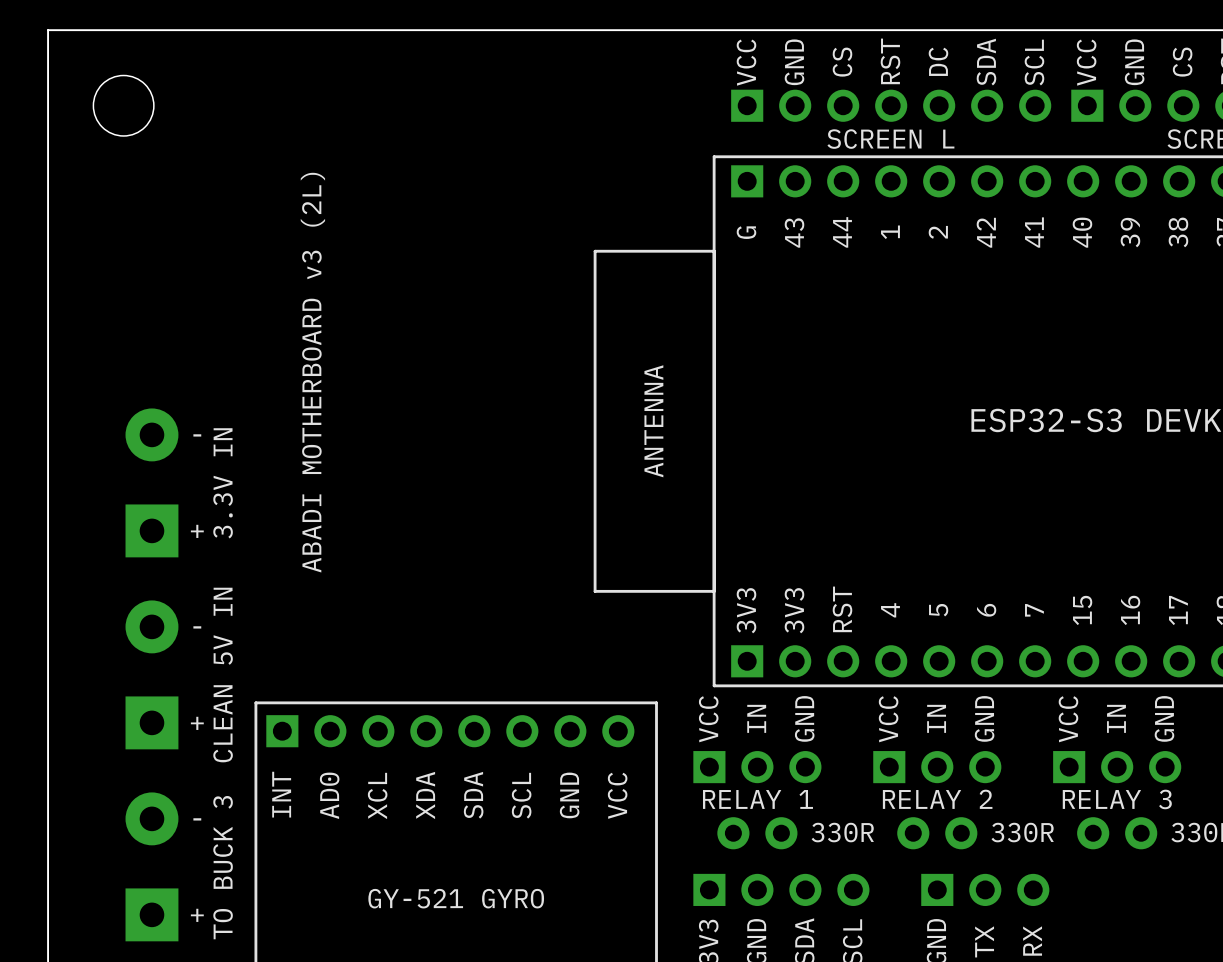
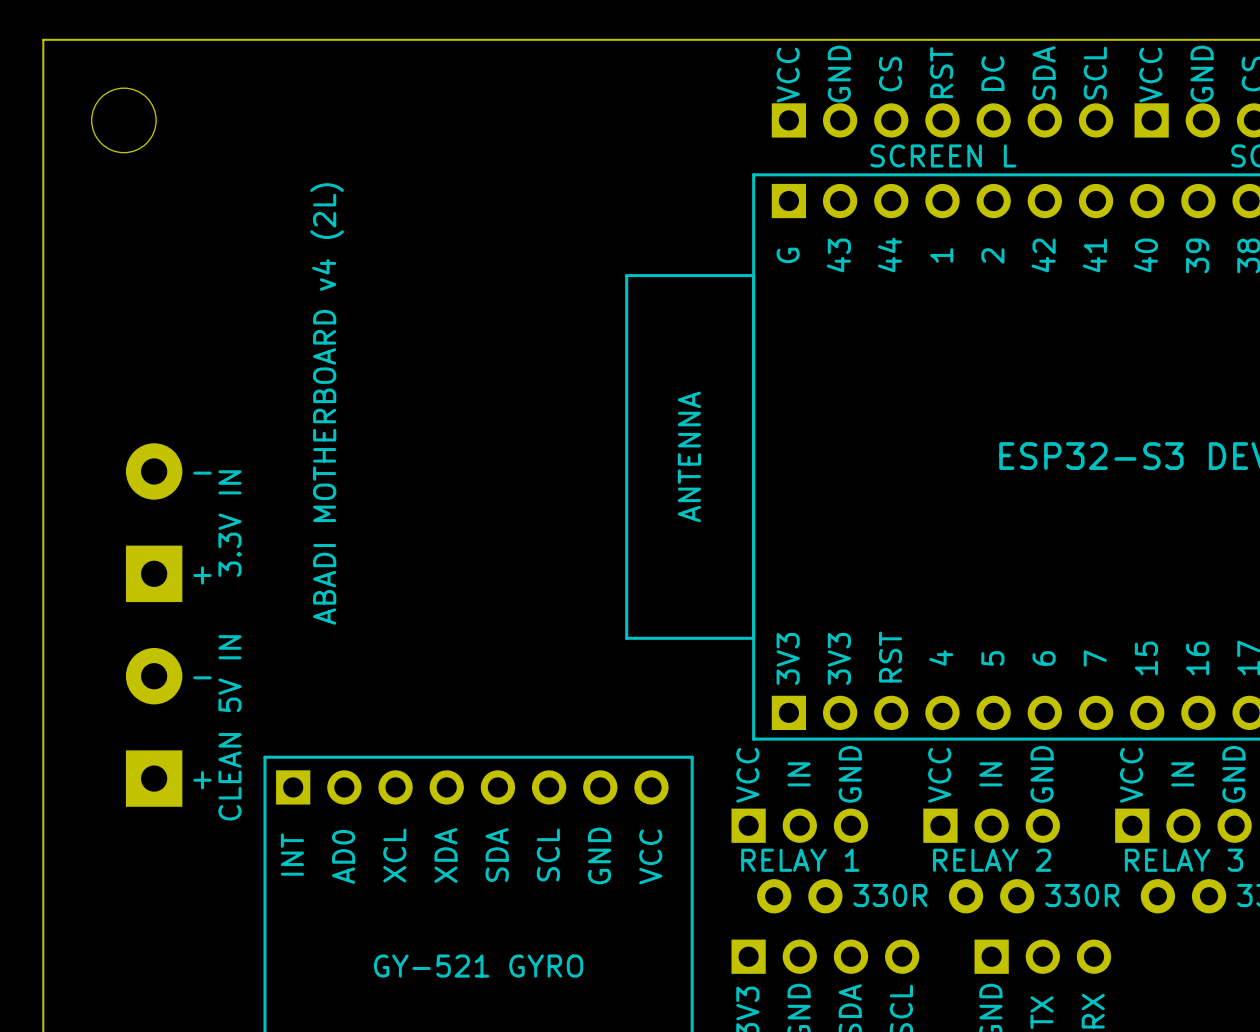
text: ABADI MOTHERBOARD v3 (2L) (312, 372) -> ABADI MOTHERBOARD v4 (2L) (327, 403)
text: - (197, 819) -> none
part: (151, 866) -> none
text: TO BUCK 3 (223, 867) -> none
text: + (197, 915) -> none

